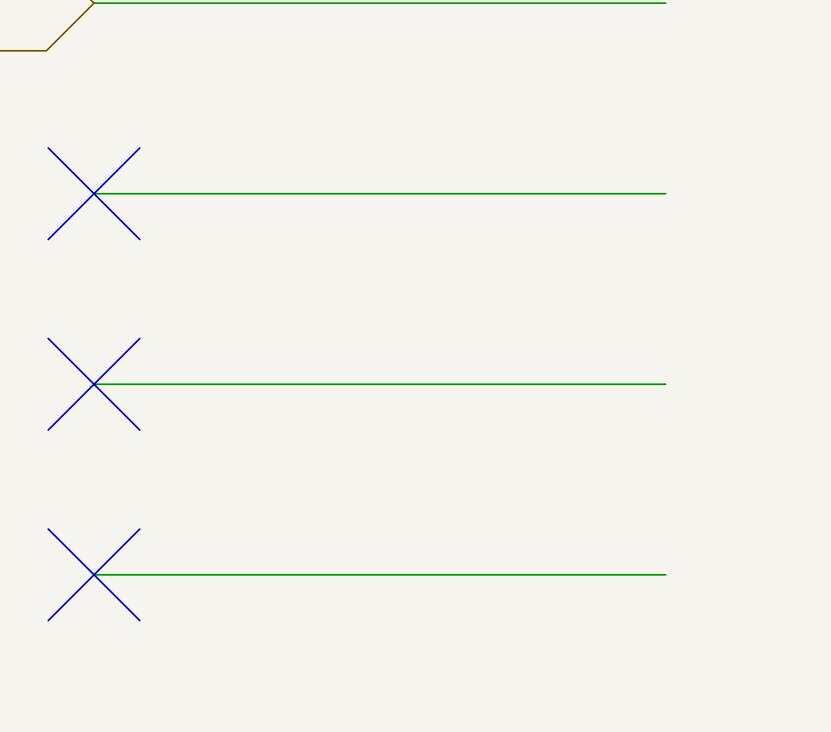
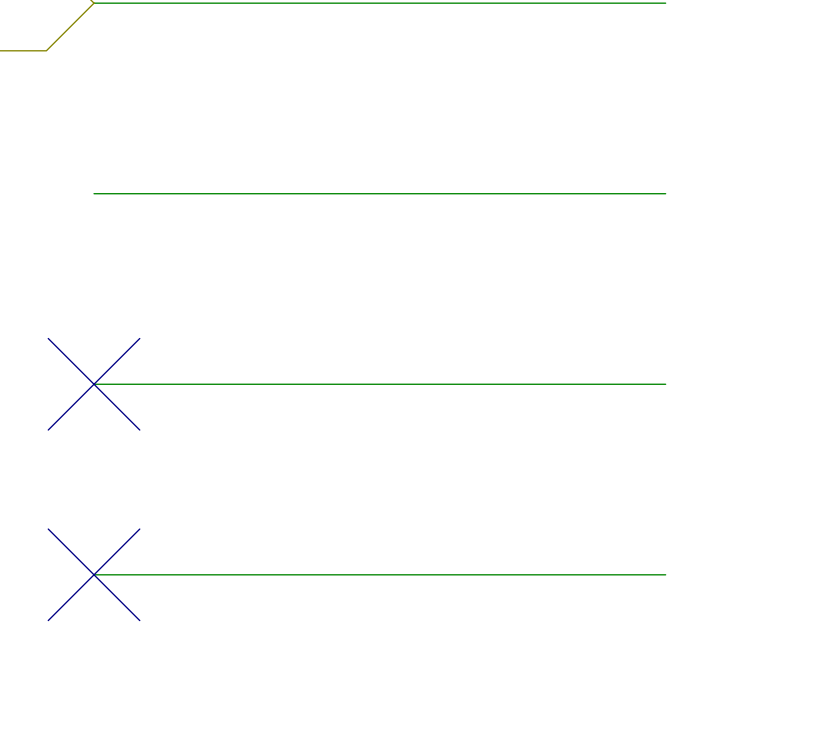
no-connect mark: (94, 193) -> none

